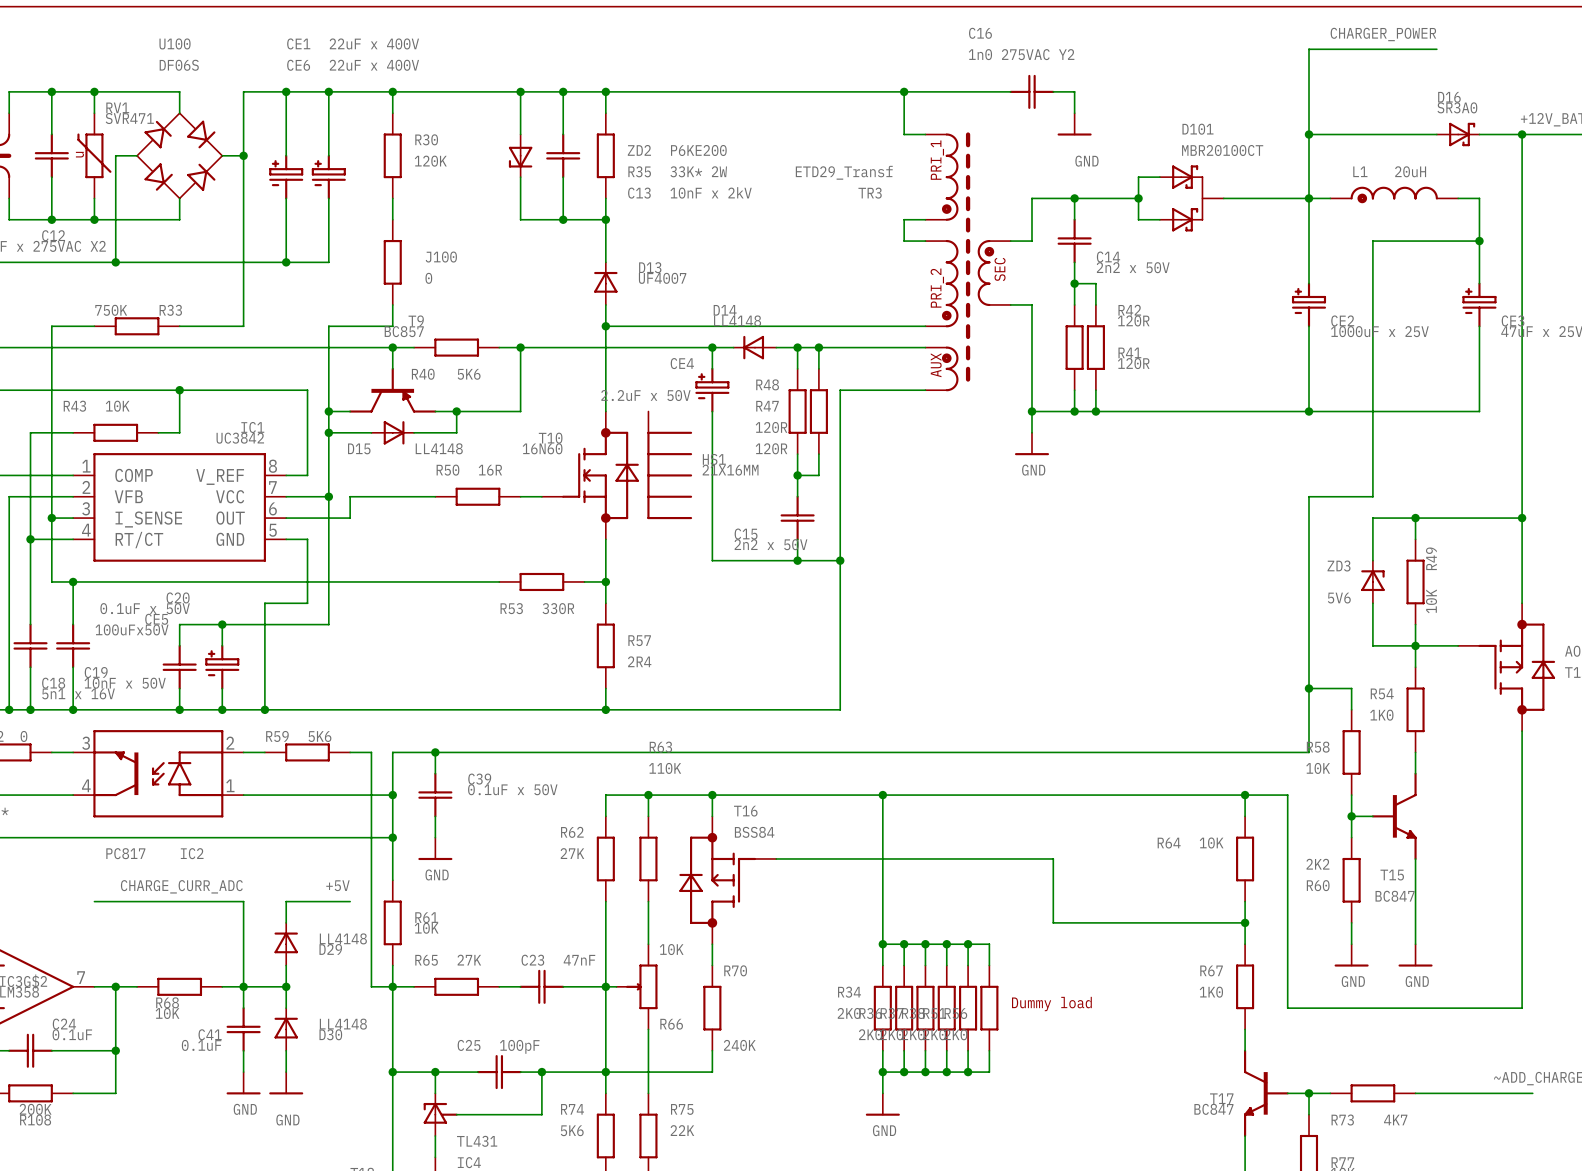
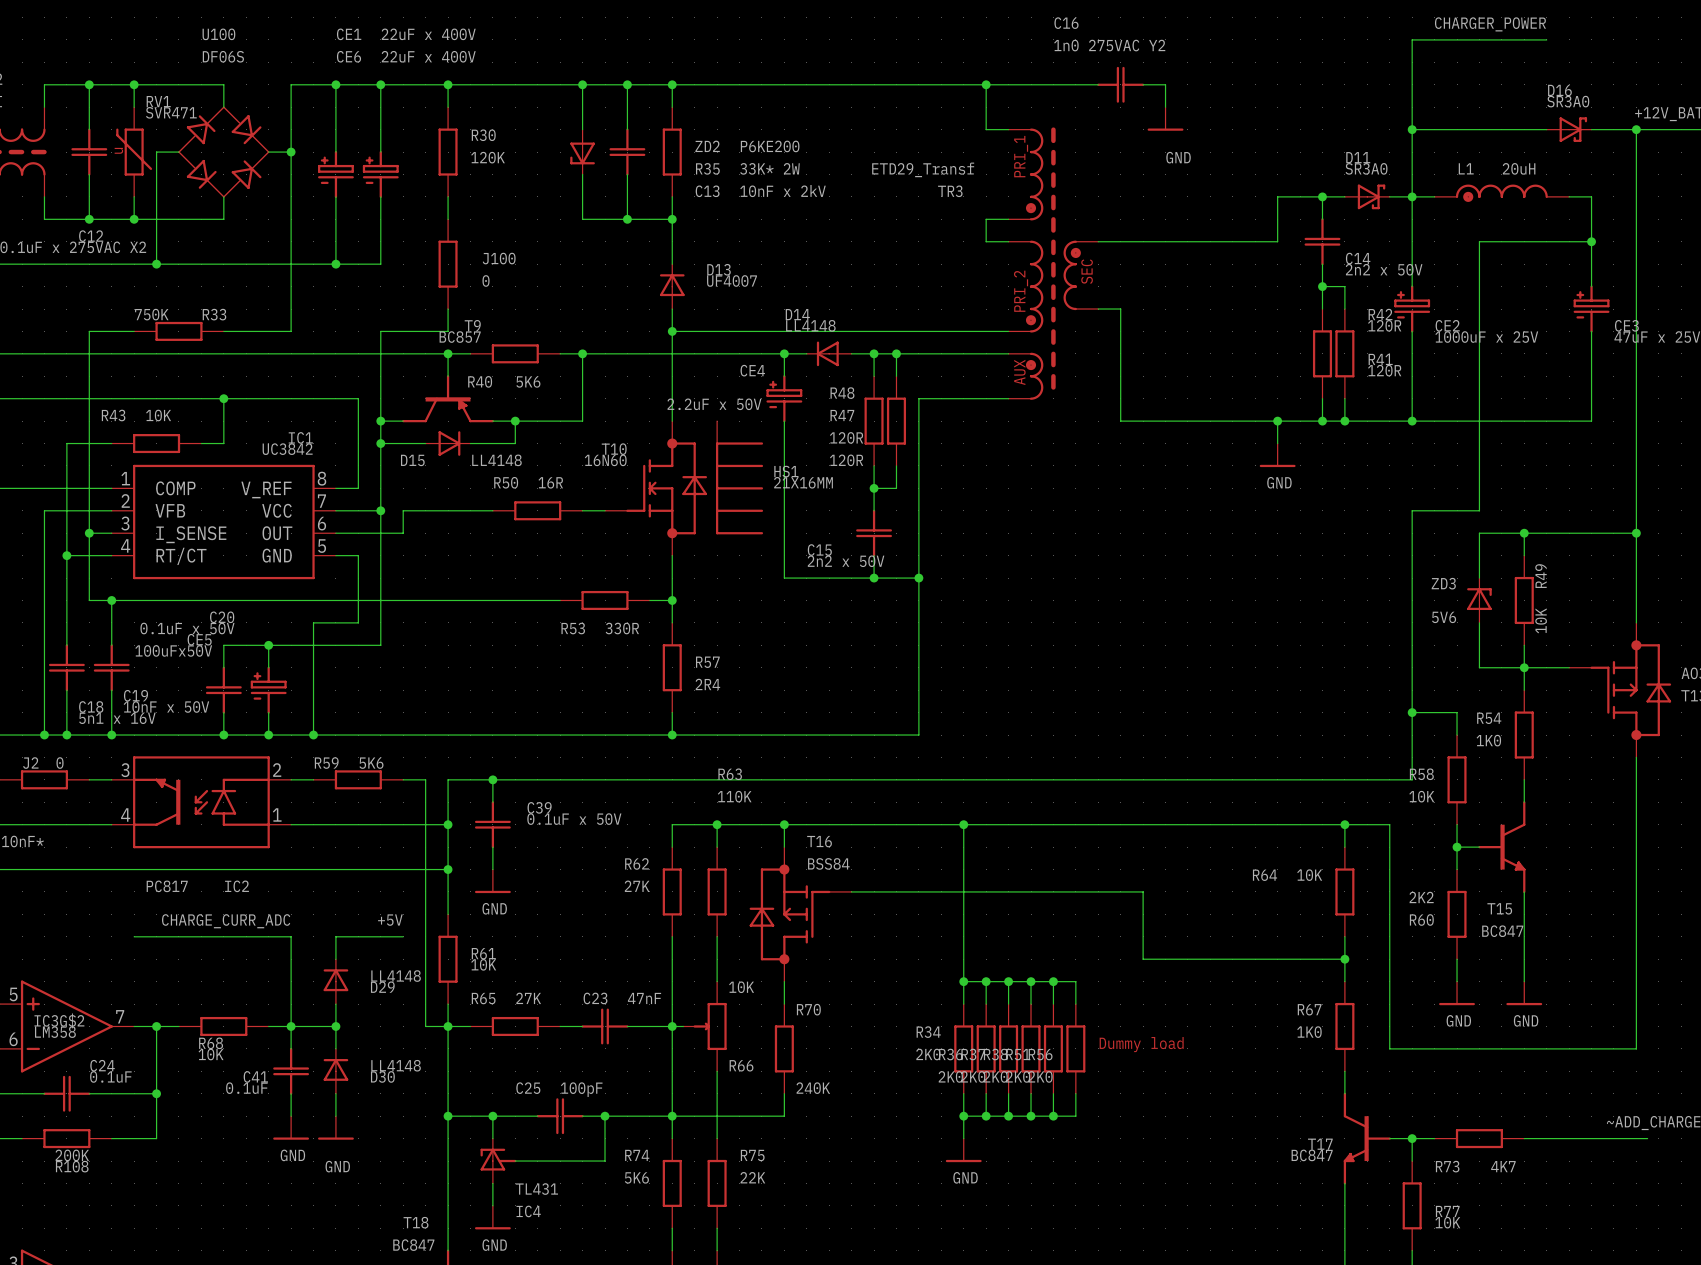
wire: (1159, 177) (1138, 177) (1138, 219) (1159, 219) -> none
wire: (1074, 198) (1074, 219) -> none
junction: (1074, 198) -> none
wire: (1138, 198) (1031, 198) (1031, 241) -> (1322, 219) (1322, 196) (1277, 196) (1277, 241) (1120, 241)
junction: (1138, 198) -> none
D101: MBR20100CT (1191, 198) -> none
junction: none -> (1322, 196)
D11: none -> SR3A0 (1367, 196)
C14 position: (1074, 241) -> (1322, 241)
wire: (1074, 262) (1074, 304) -> (1322, 264) (1322, 309)
wire: (1074, 283) (1095, 283) (1095, 304) -> (1322, 286) (1344, 286) (1344, 309)
junction: (1074, 283) -> none
junction: none -> (1322, 286)
R41 position: (1074, 347) -> (1322, 353)
R42 position: (1095, 347) -> (1344, 353)
wire: (1074, 390) (1074, 411) -> (1322, 398) (1322, 421)
wire: (1095, 390) (1095, 411) -> (1344, 398) (1344, 421)
wire: (1031, 411) (1031, 432) -> (1277, 421) (1277, 443)
junction: (1031, 411) -> none
junction: (1074, 411) -> none
junction: (1095, 411) -> none
junction: none -> (1277, 421)
junction: none -> (1322, 421)
junction: none -> (1344, 421)
power symbol position: GND (1031, 444) -> GND (1277, 455)

